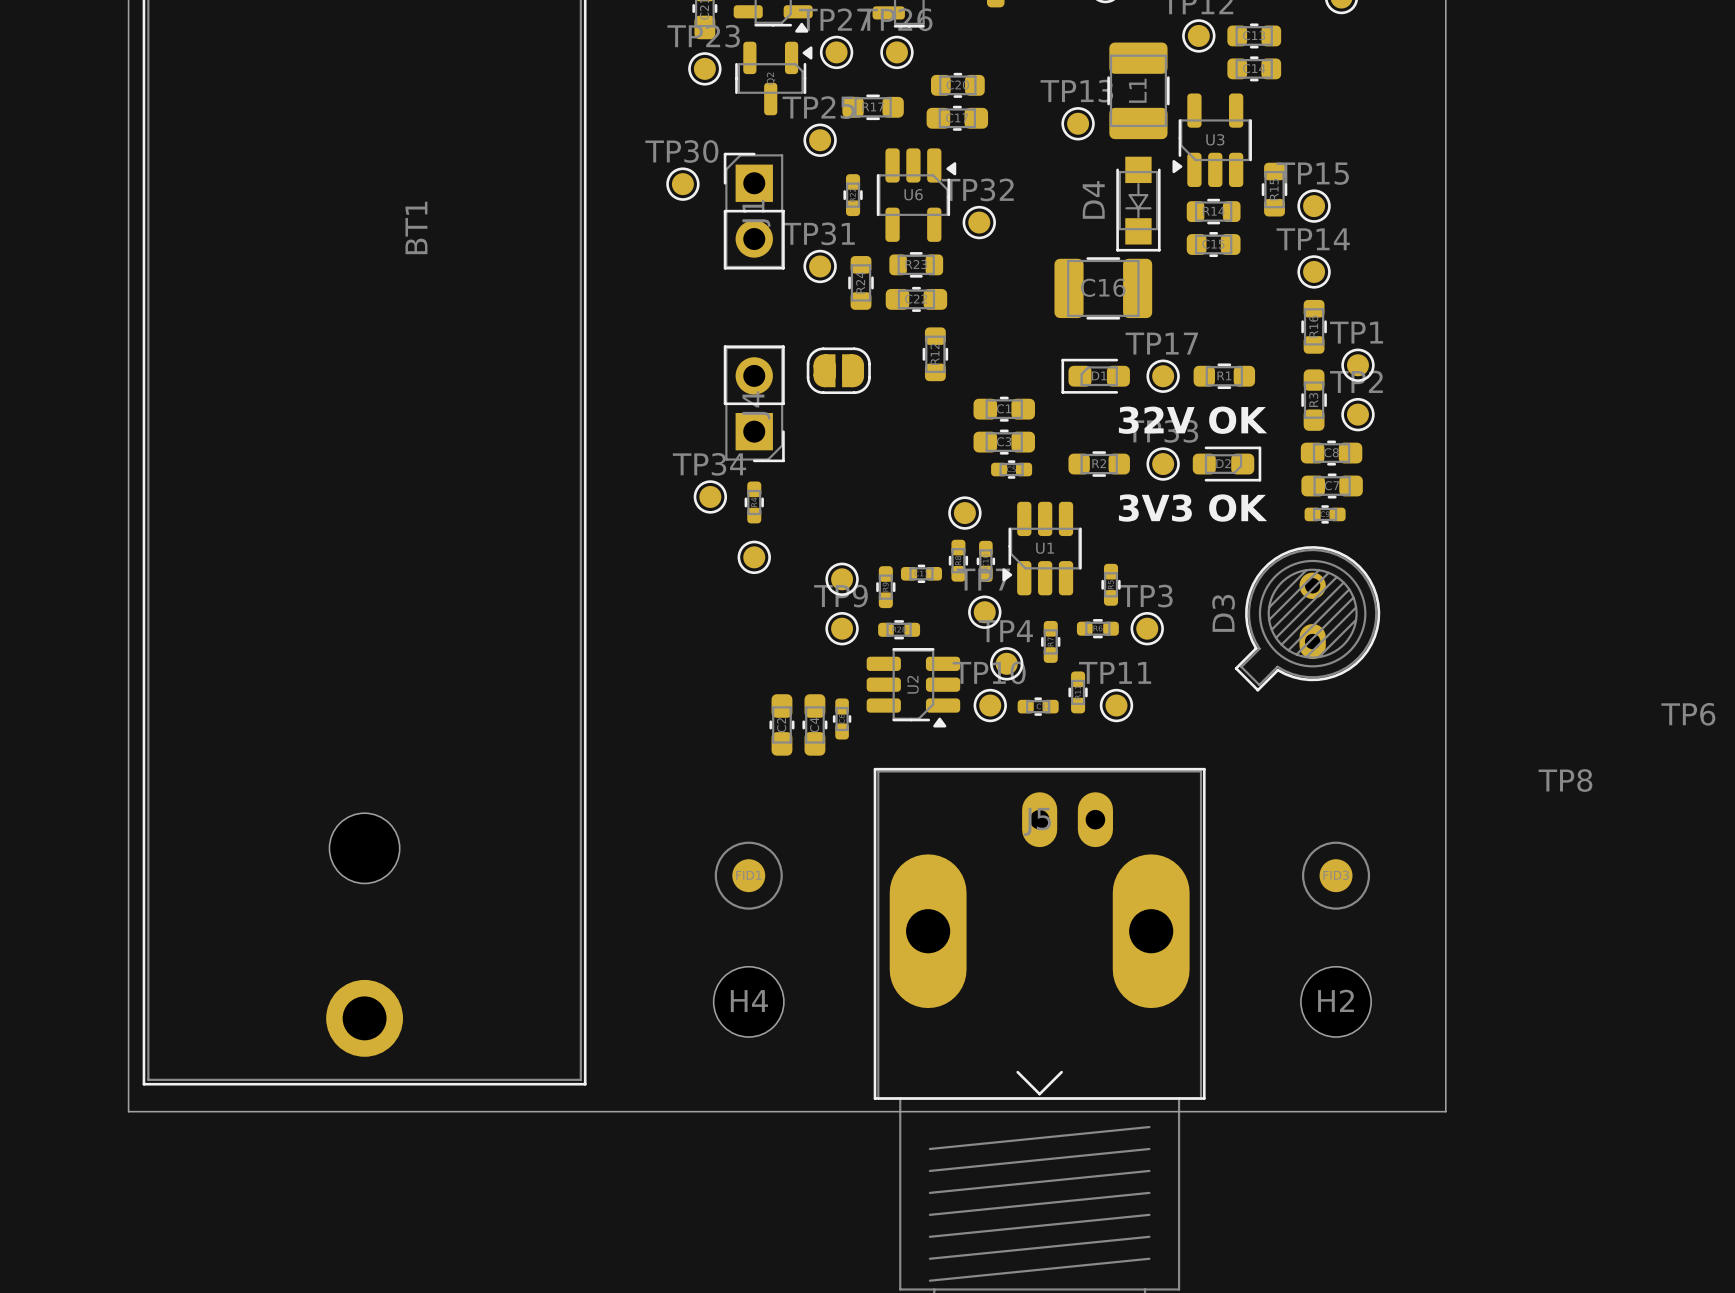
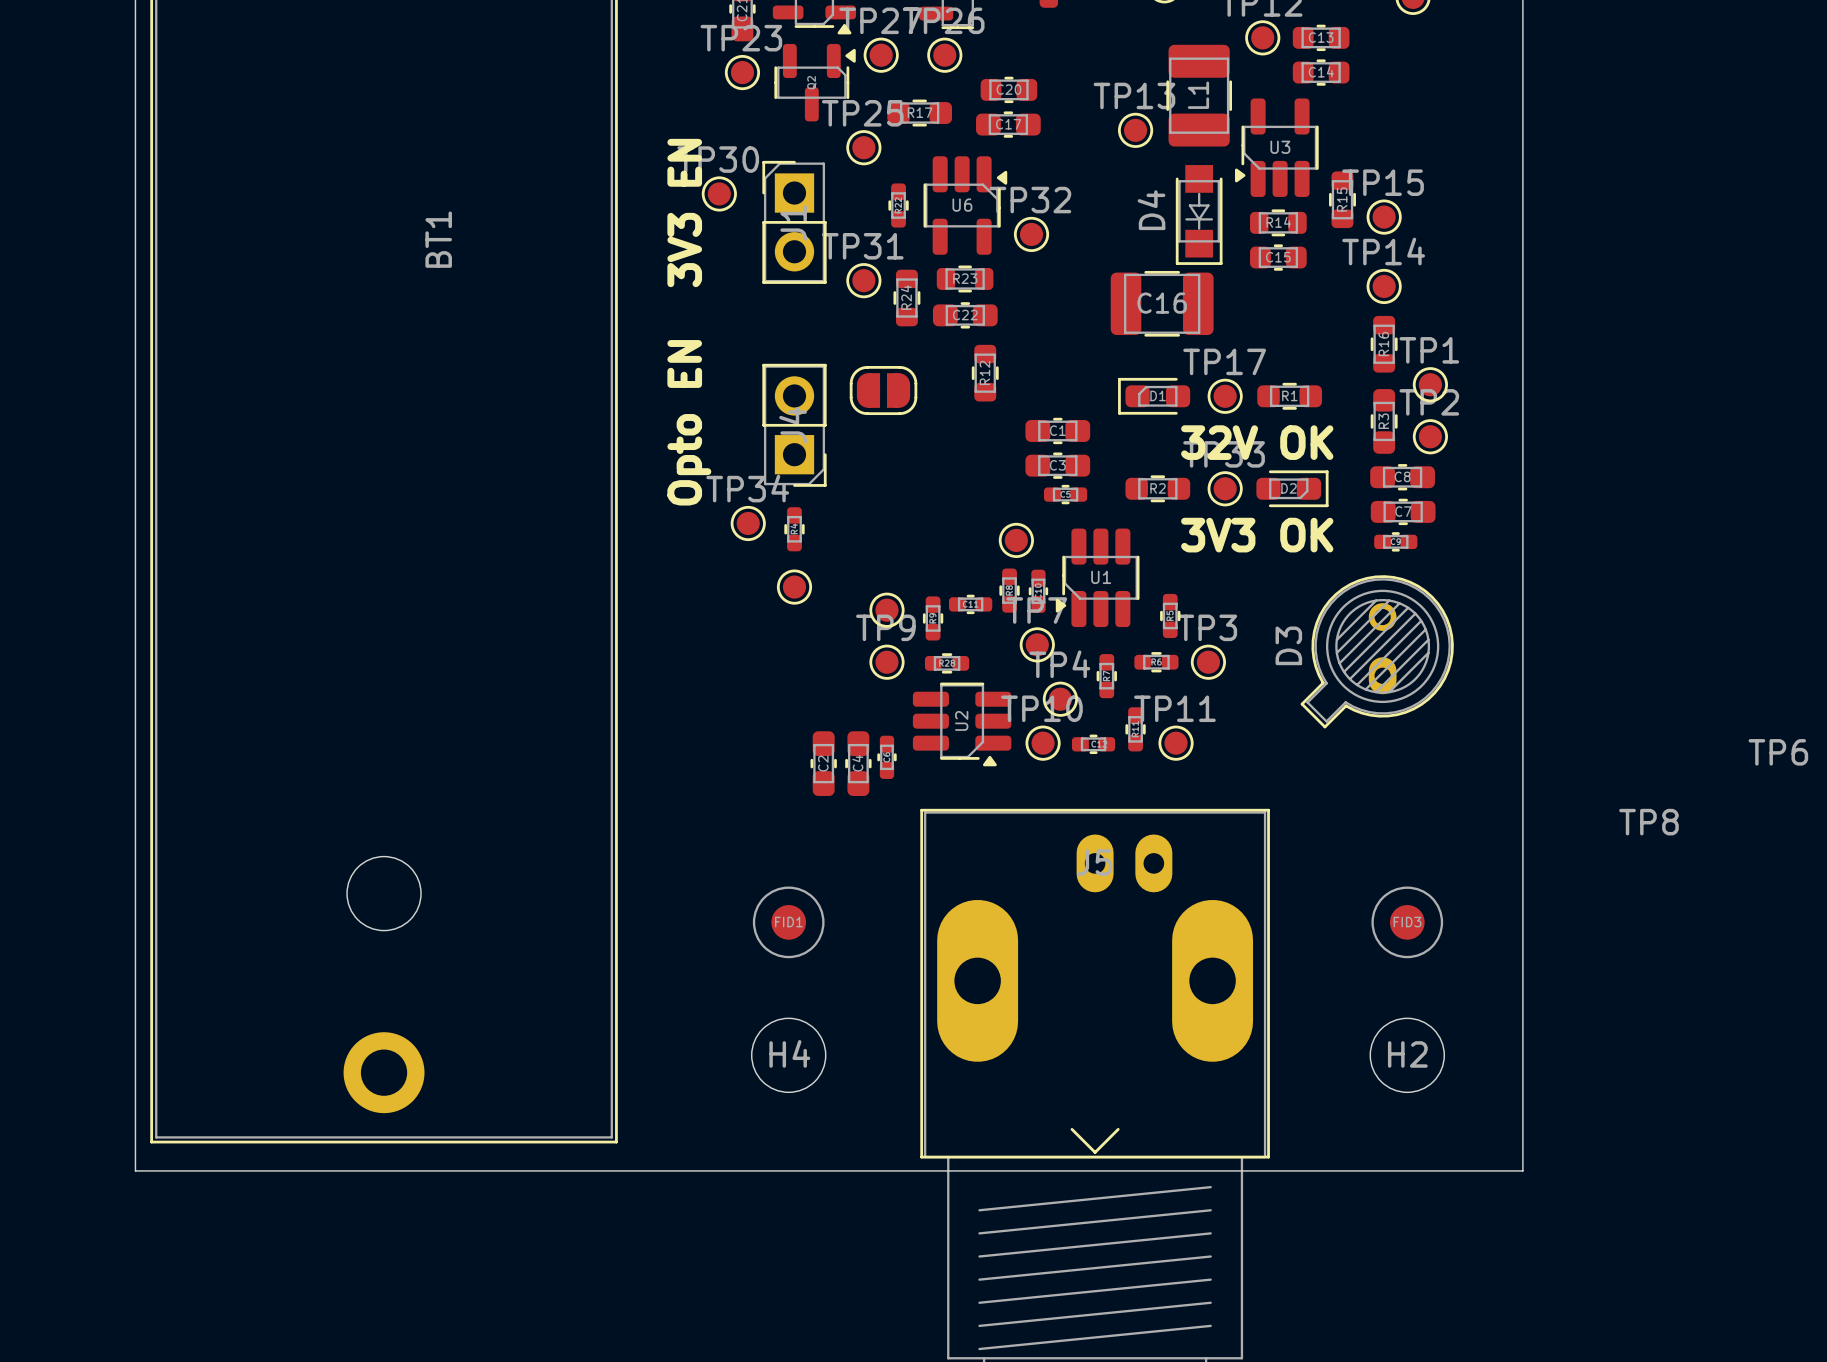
text: none -> 3V3 EN (684, 213)
text: none -> Opto EN (689, 422)

